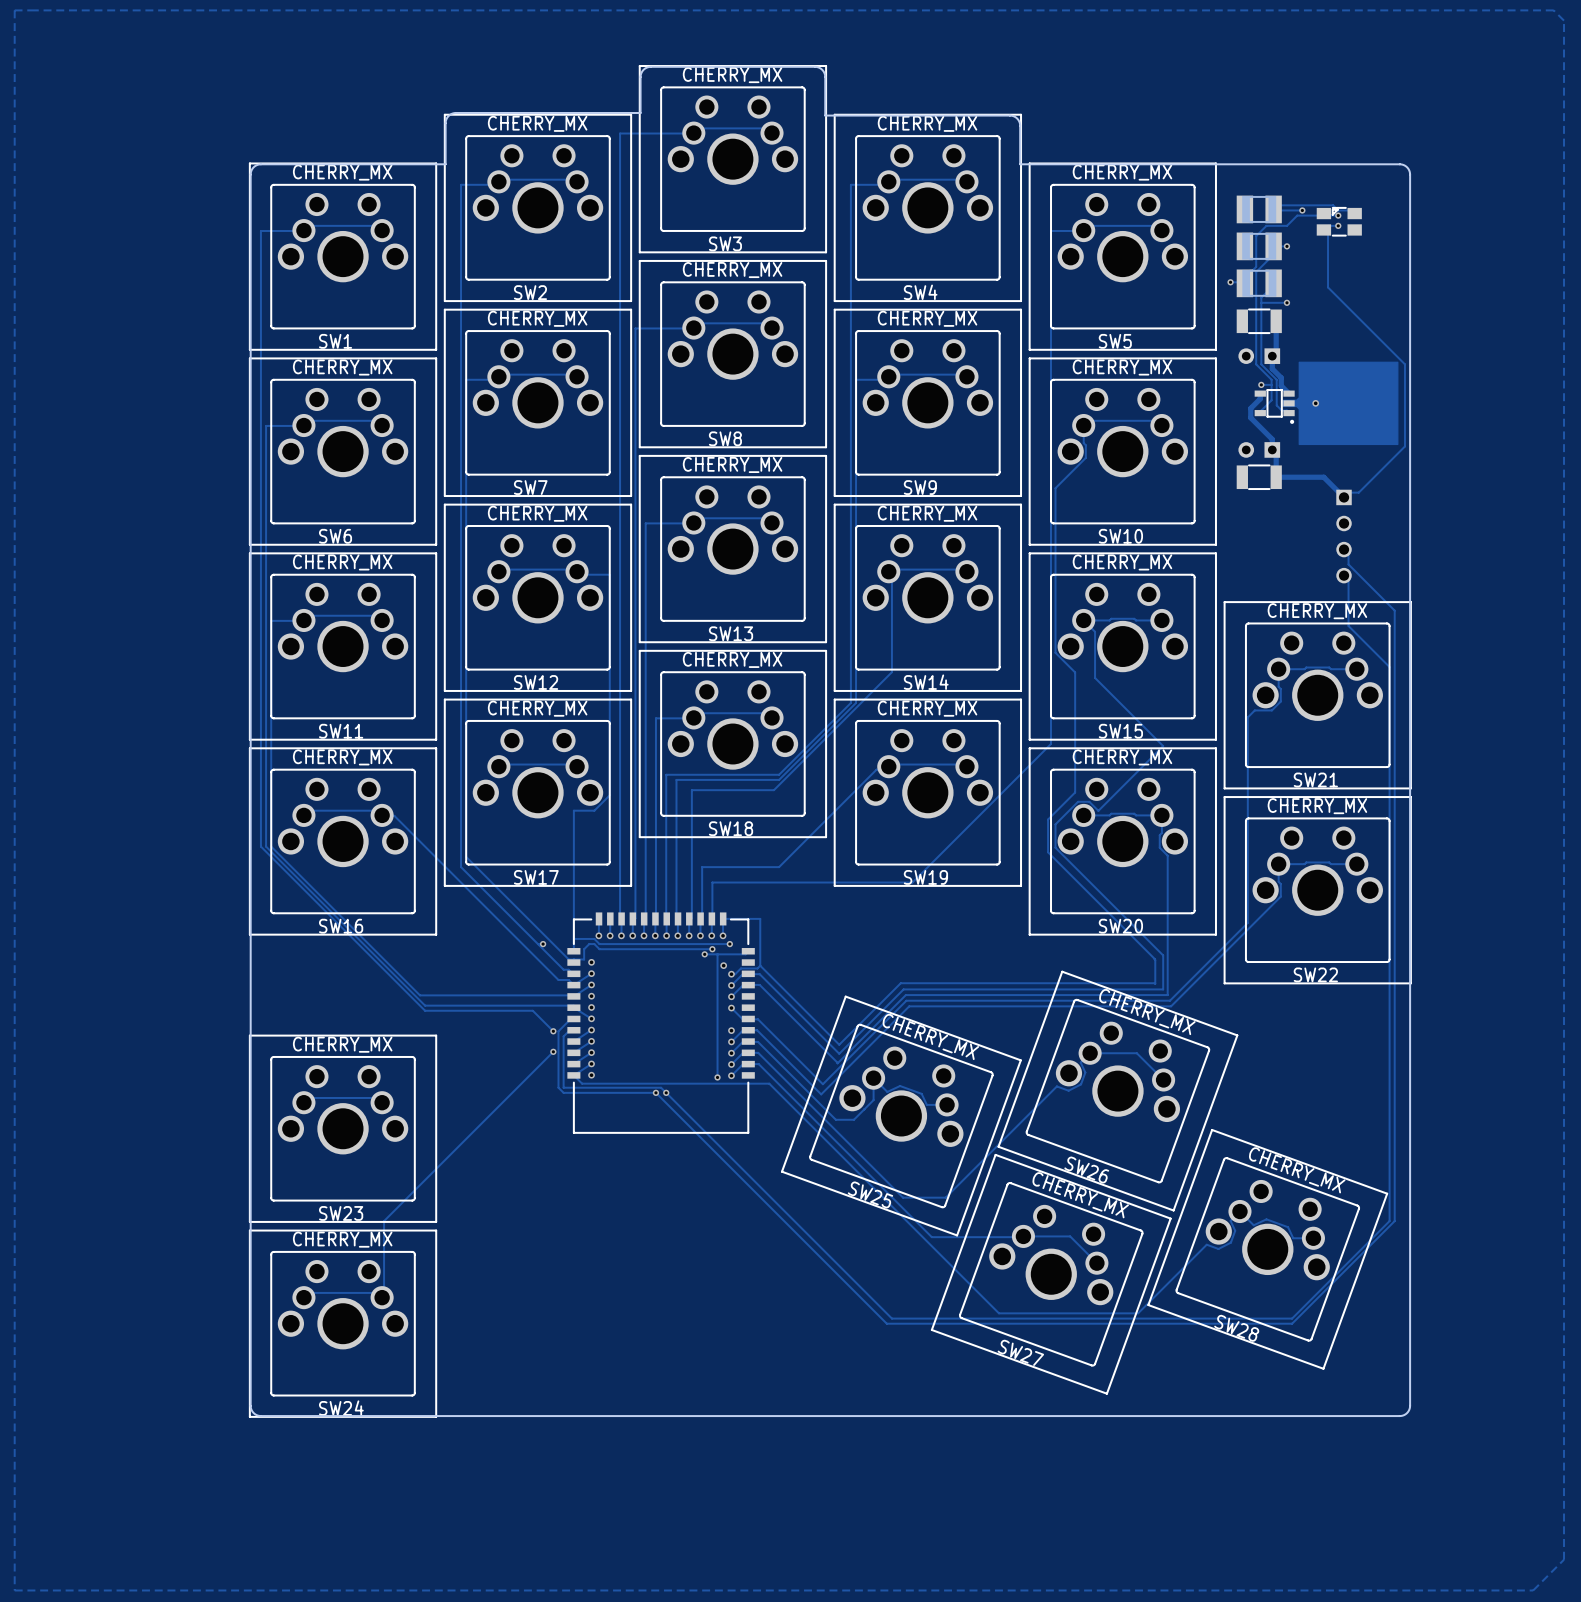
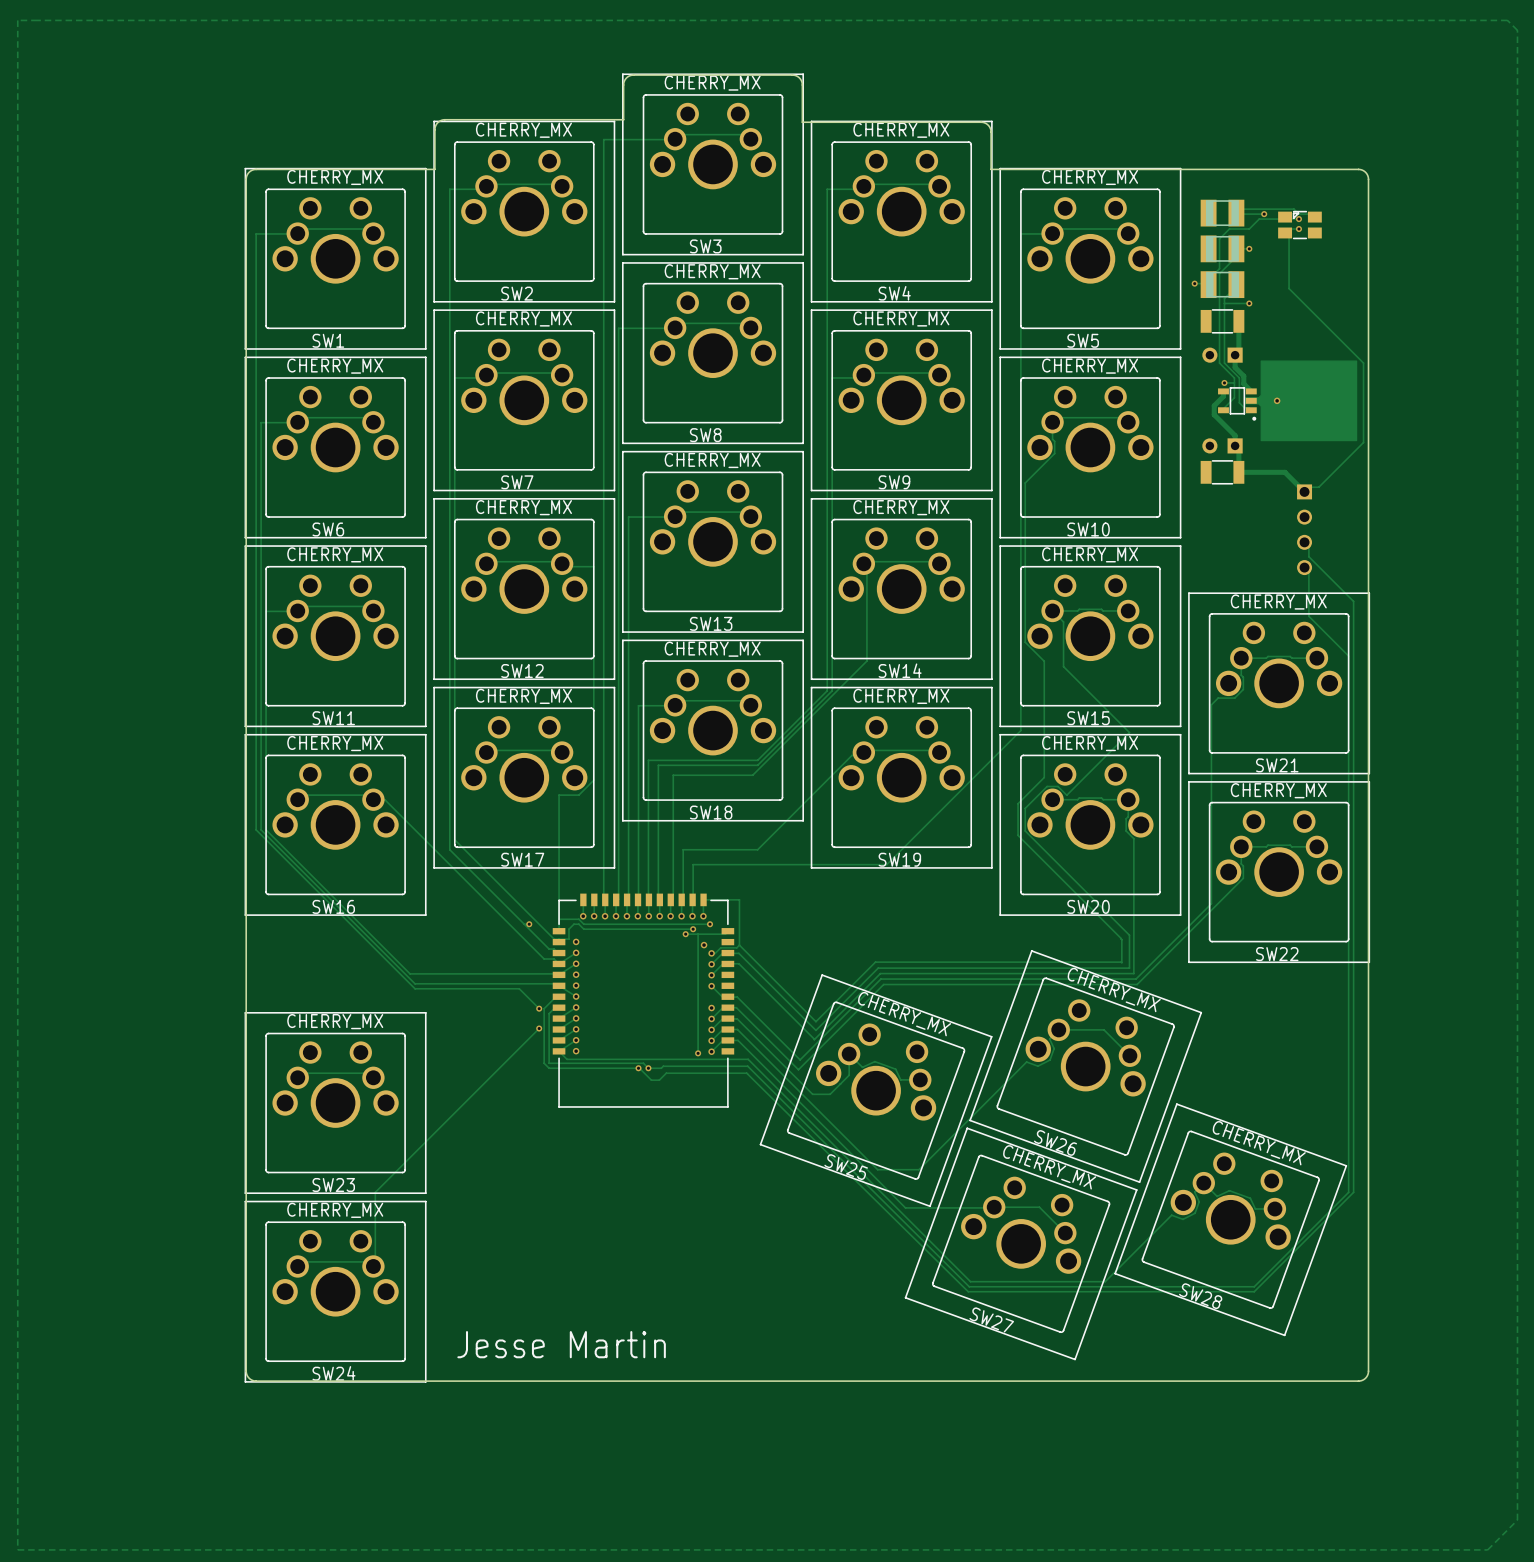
track: (655, 1092) (886, 1323) (996, 1323) -> (638, 1068) (651, 1080) (659, 1080) (666, 1073) (746, 1073) (968, 1291)
track: (666, 1092) (891, 1318) (997, 1318) -> (648, 1068) (661, 1068) (663, 1066) (747, 1066) (969, 1286)
text: none -> Jesse Martin (561, 1344)

